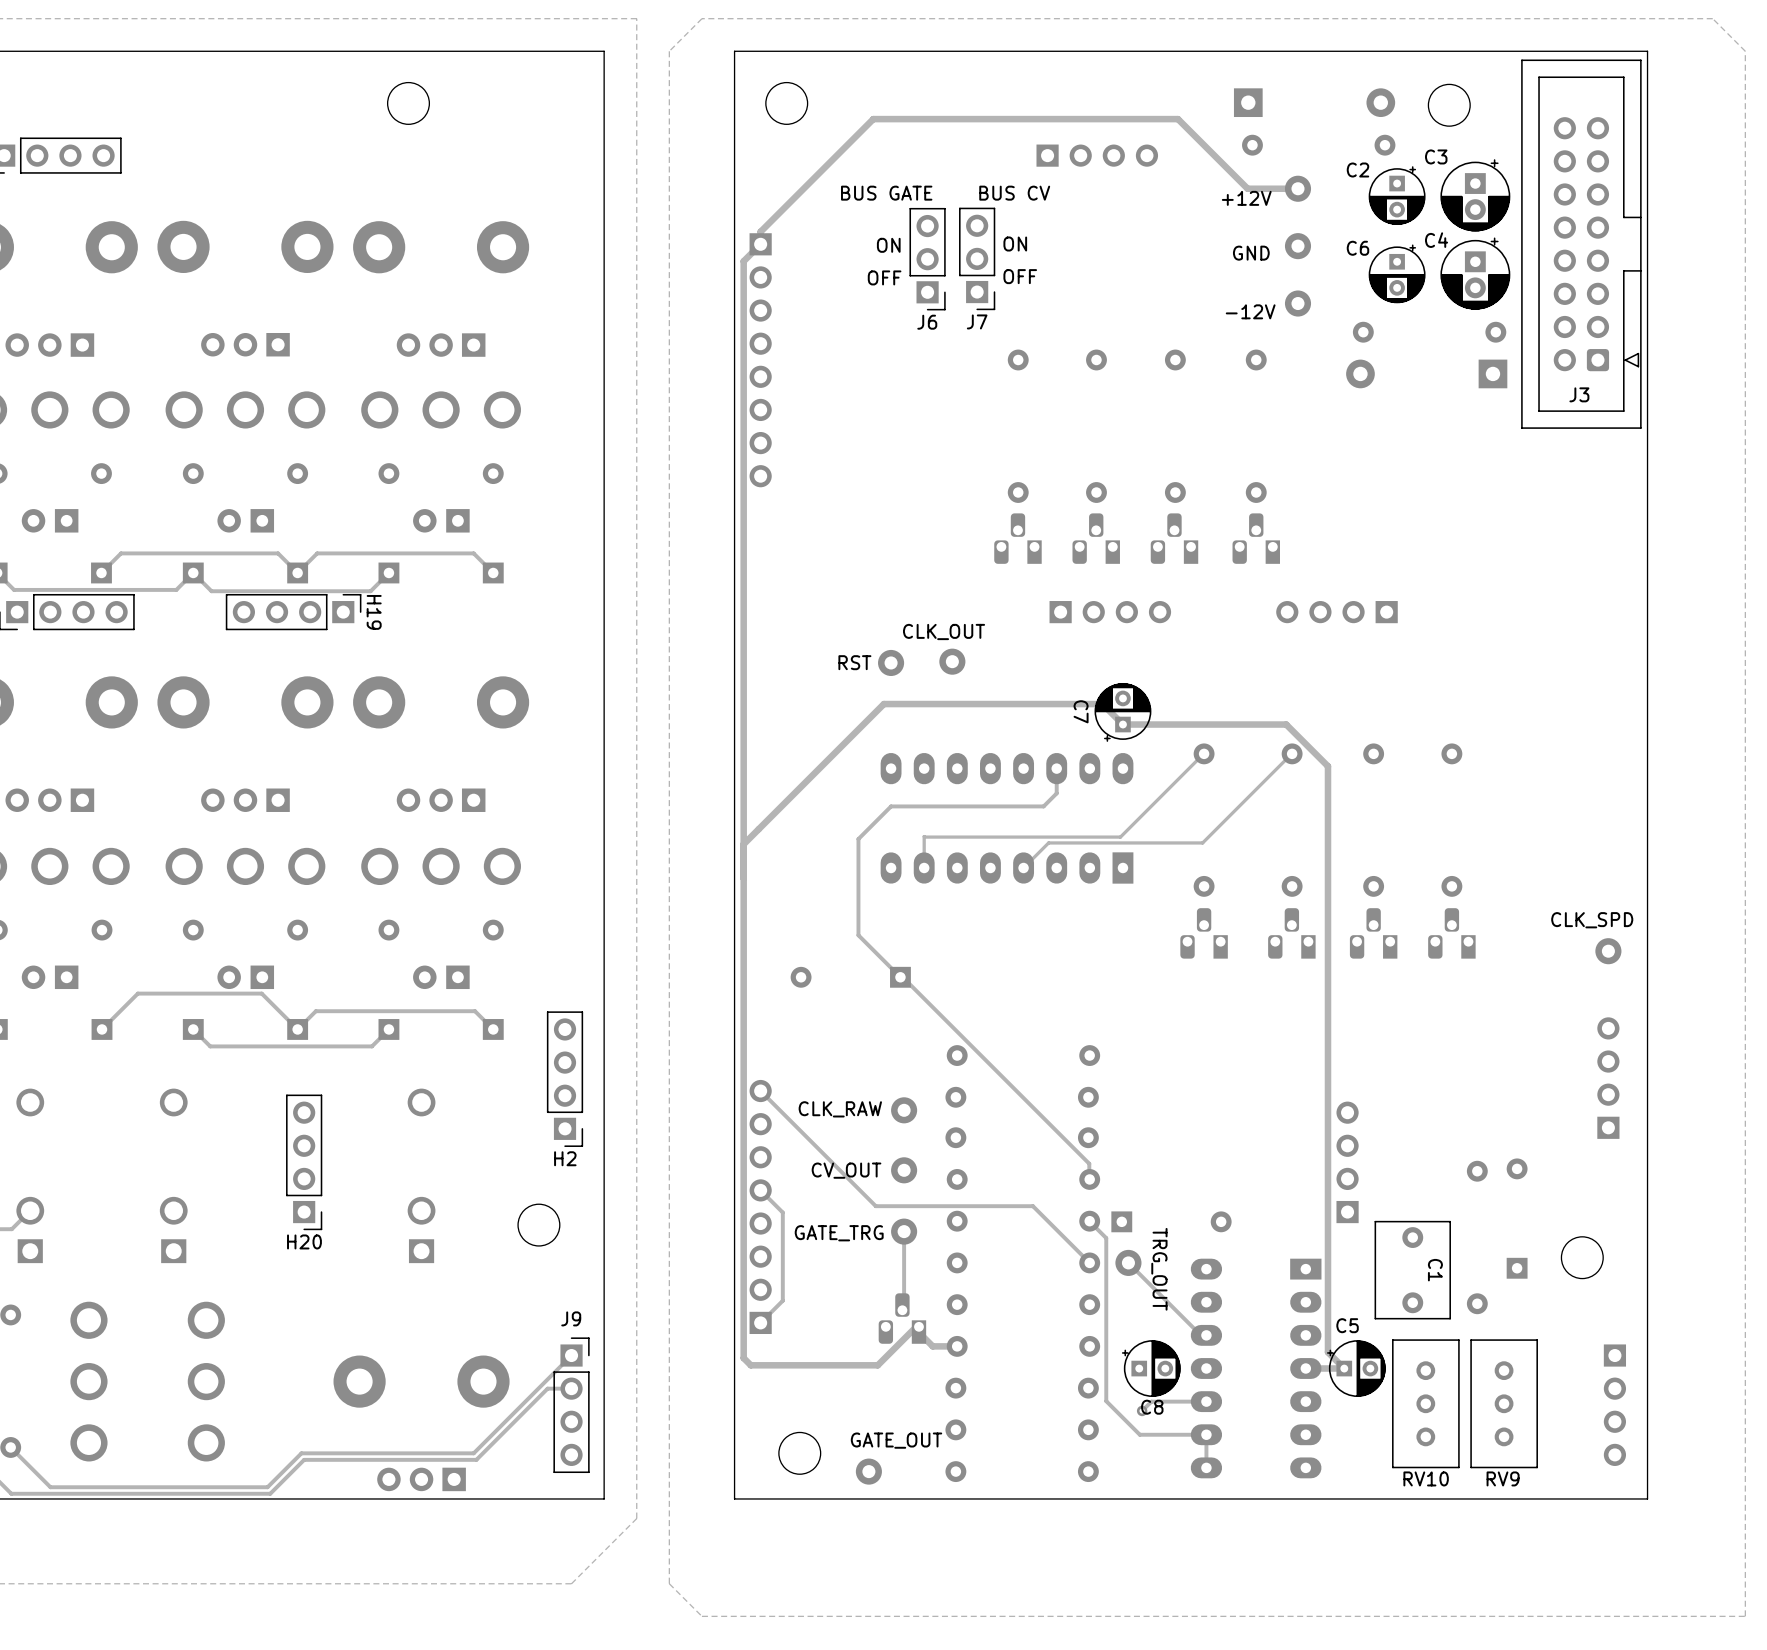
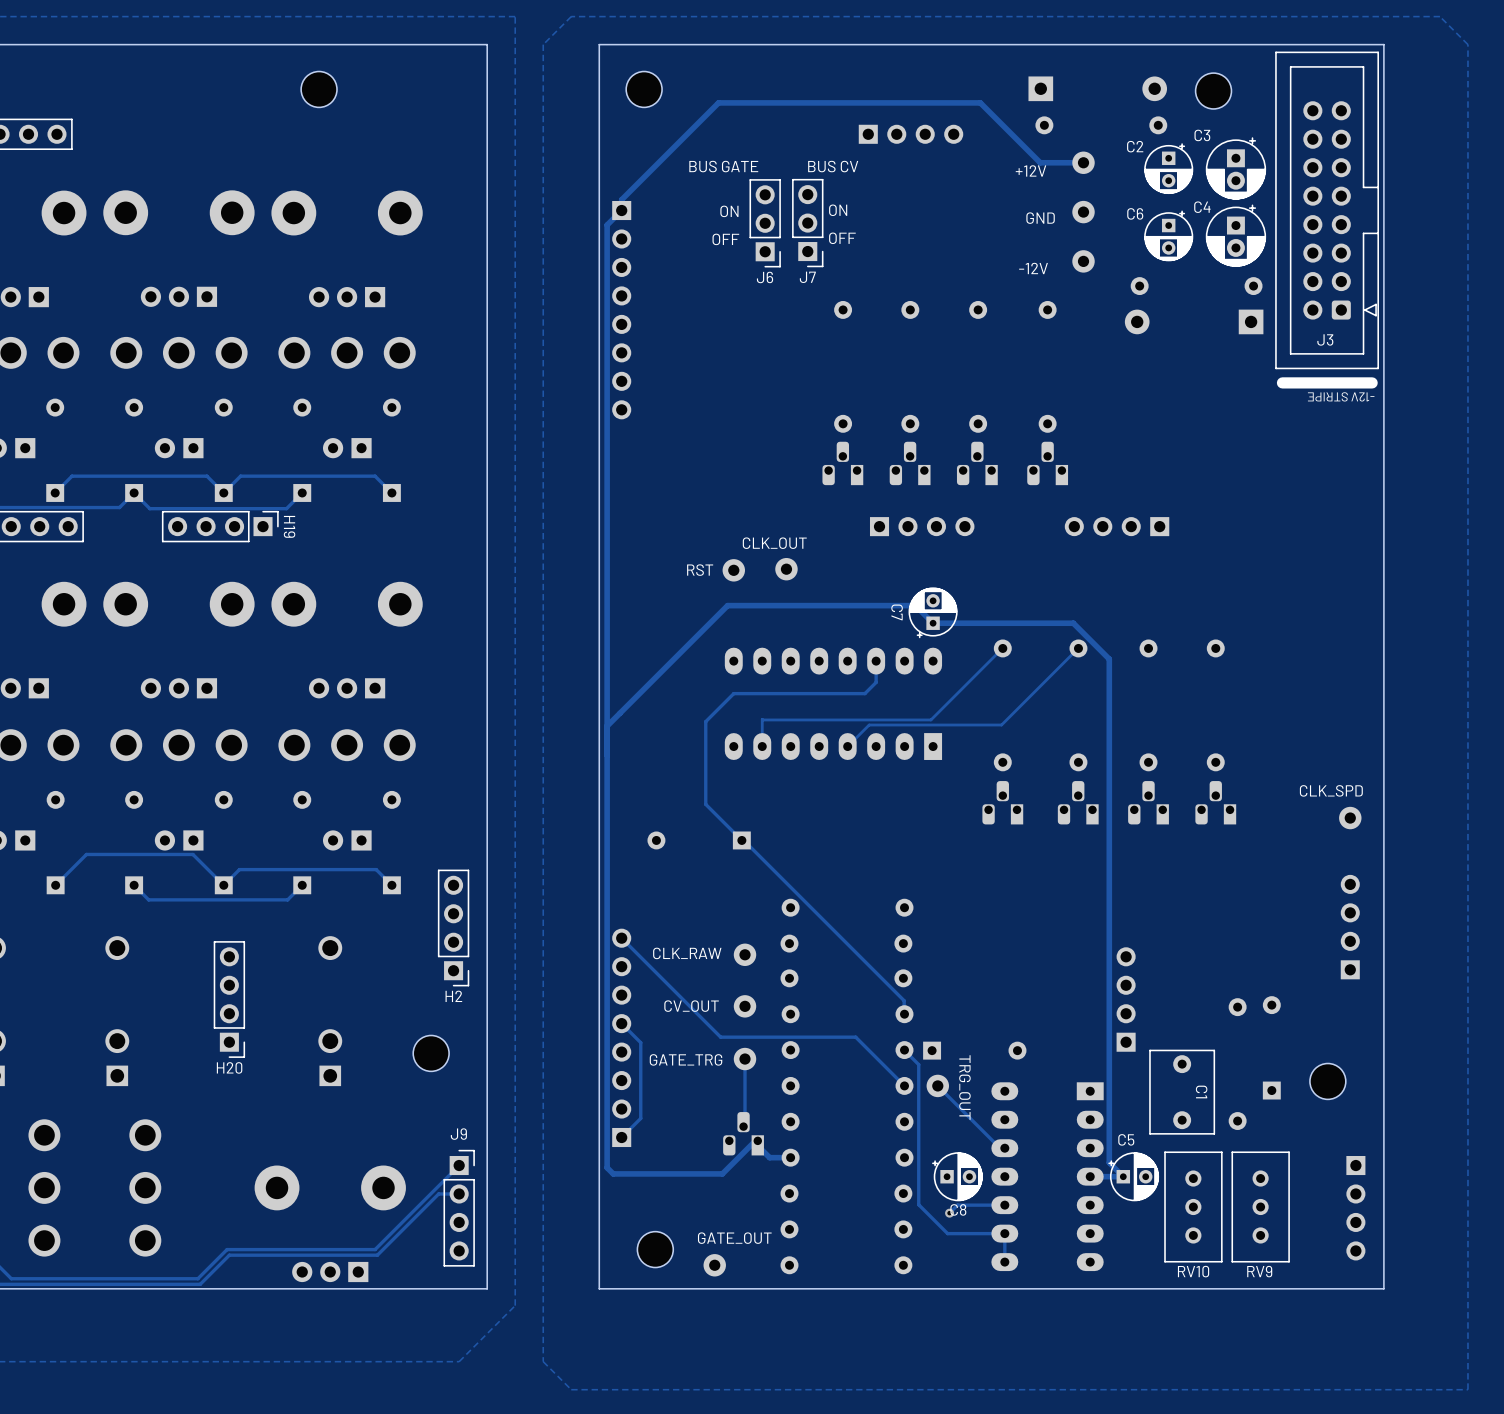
J3 footprint: [1521, 59, 1642, 429] -> [1275, 51, 1379, 389]

